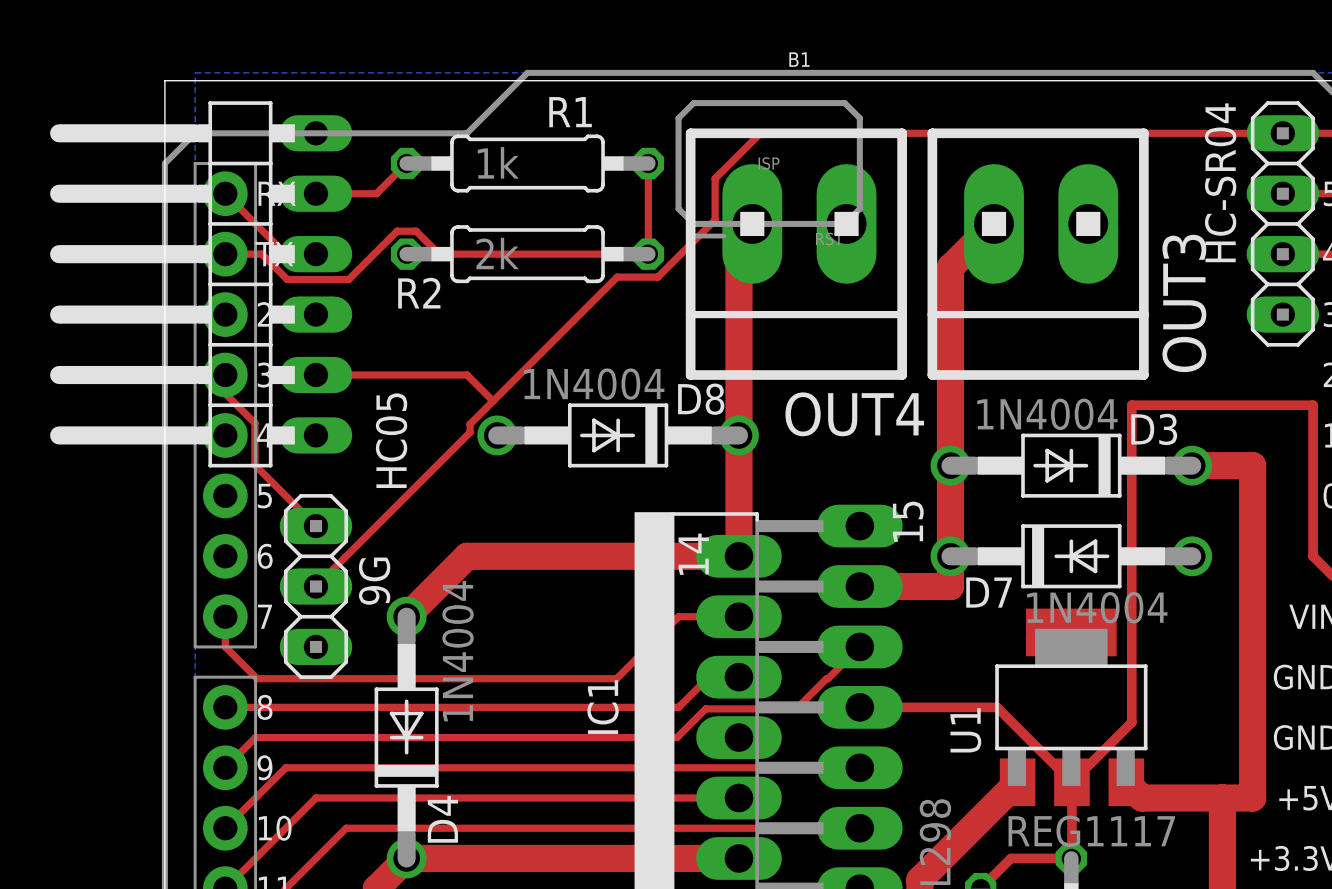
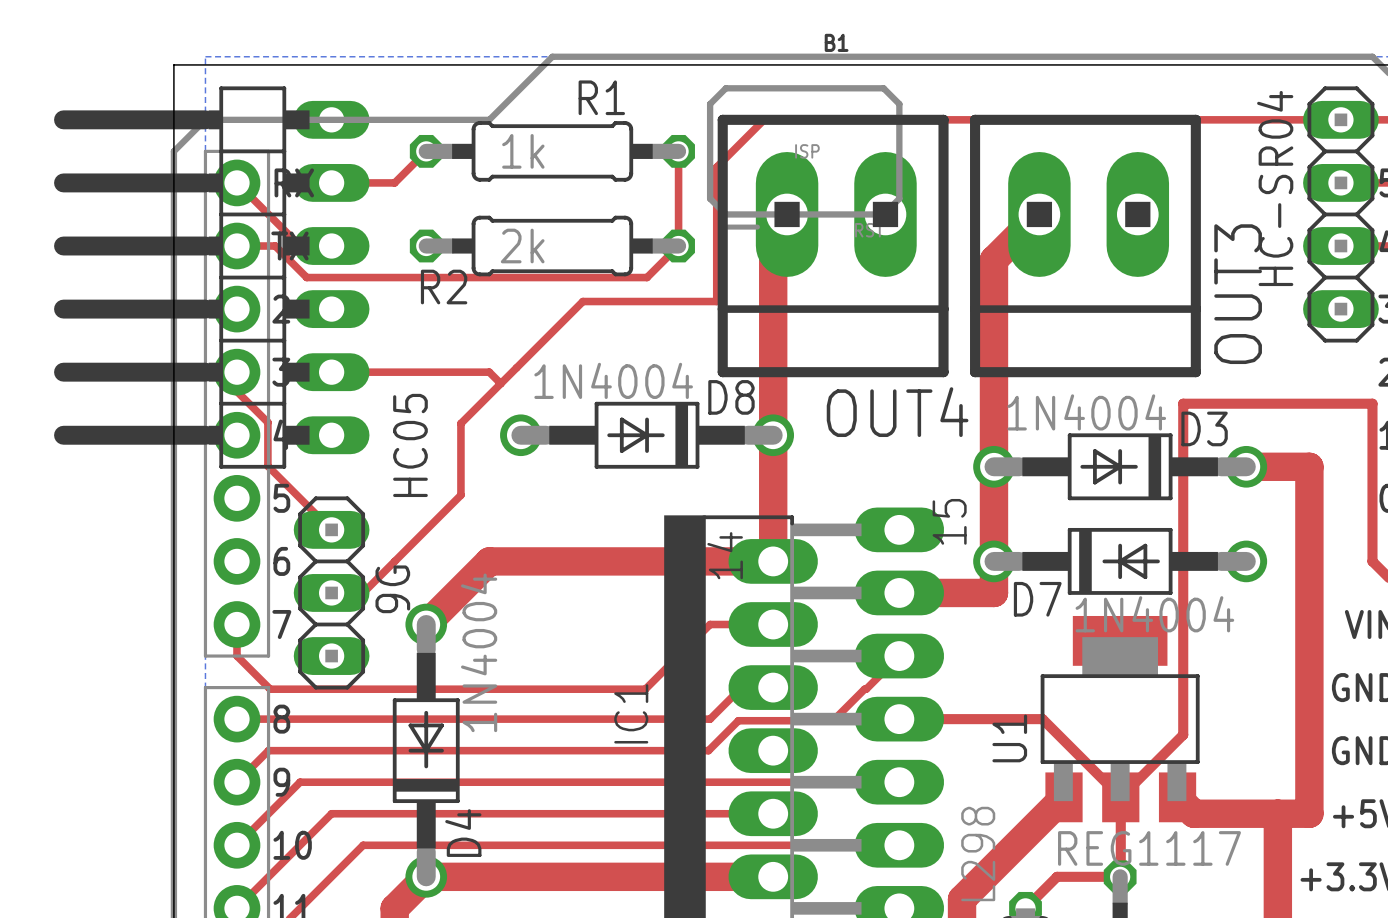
top track: (760, 133) (715, 178) (715, 219) (657, 277) (617, 277) (470, 424) (470, 432) (315, 586) -> (795, 119) (764, 119) (716, 167) (716, 301) (582, 301) (460, 423) (460, 495) (363, 592) (331, 592)
top track: (648, 254) (439, 254) (416, 231) (397, 231) (348, 279) (287, 279) -> (678, 246) (647, 277) (306, 277) (301, 272)
top track: (478, 386) (493, 401) -> none

